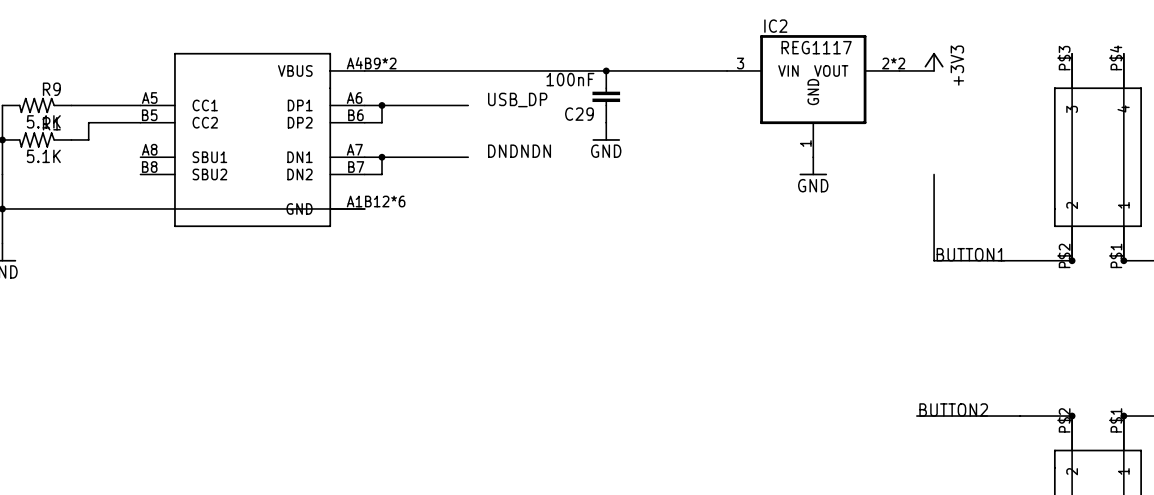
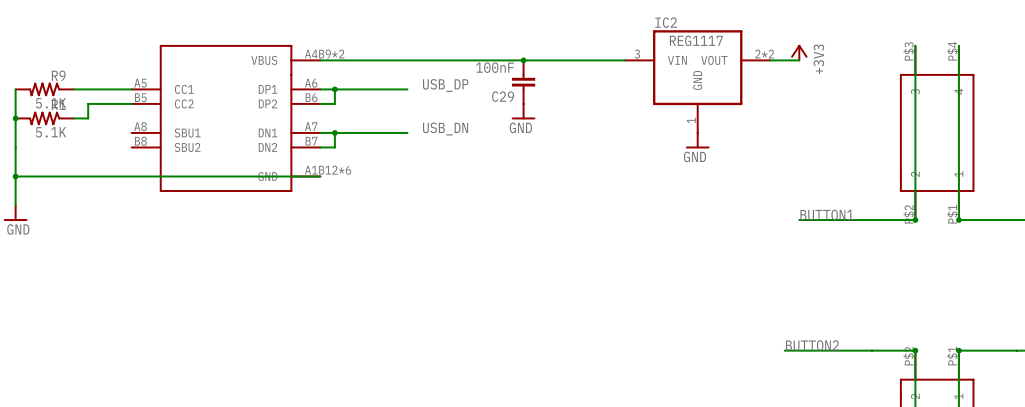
label: DNDNDN (519, 151) -> USB_DN (445, 129)
wire: (934, 174) (934, 260) -> none

